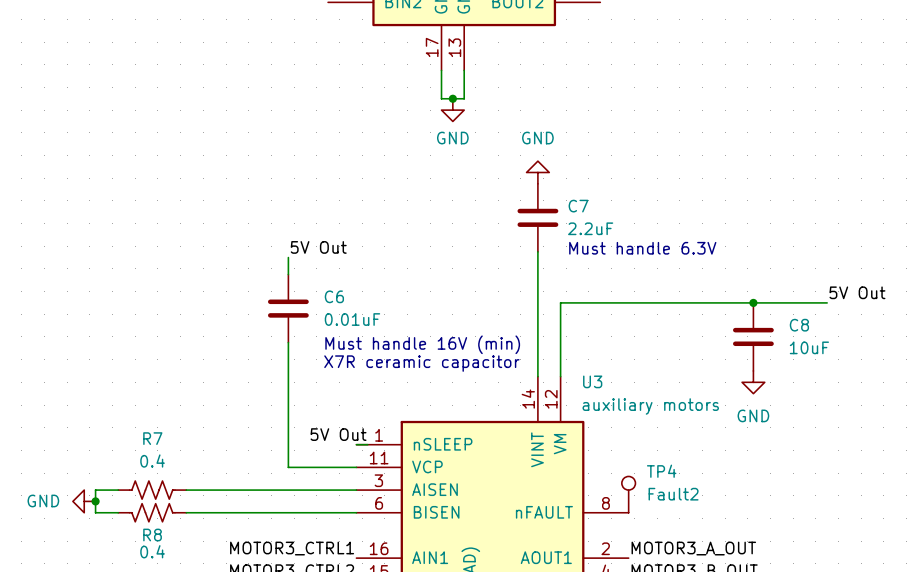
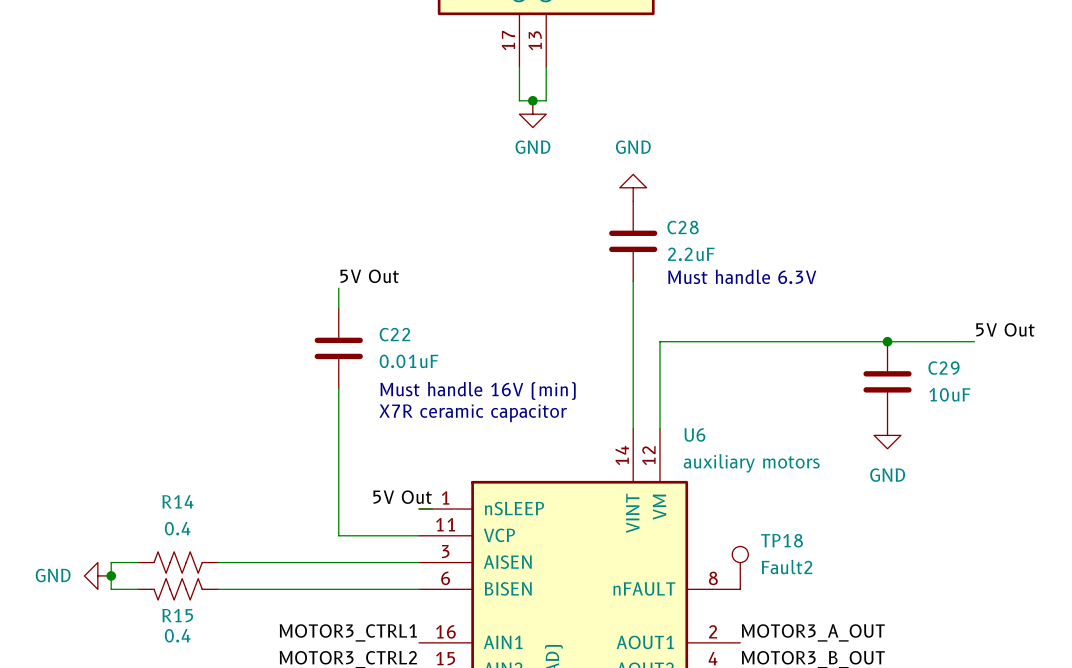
C7 name: C7 (578, 206) -> C28 (683, 227)
C6 name: C6 (334, 296) -> C22 (394, 334)
C8 name: C8 (799, 325) -> C29 (944, 368)
U3 name: U3 (592, 381) -> U6 (694, 434)
R7 name: R7 (152, 438) -> R14 (177, 501)
TP4 name: TP4 (661, 471) -> TP18 (781, 540)
R8 name: R8 (152, 535) -> R15 (177, 615)

